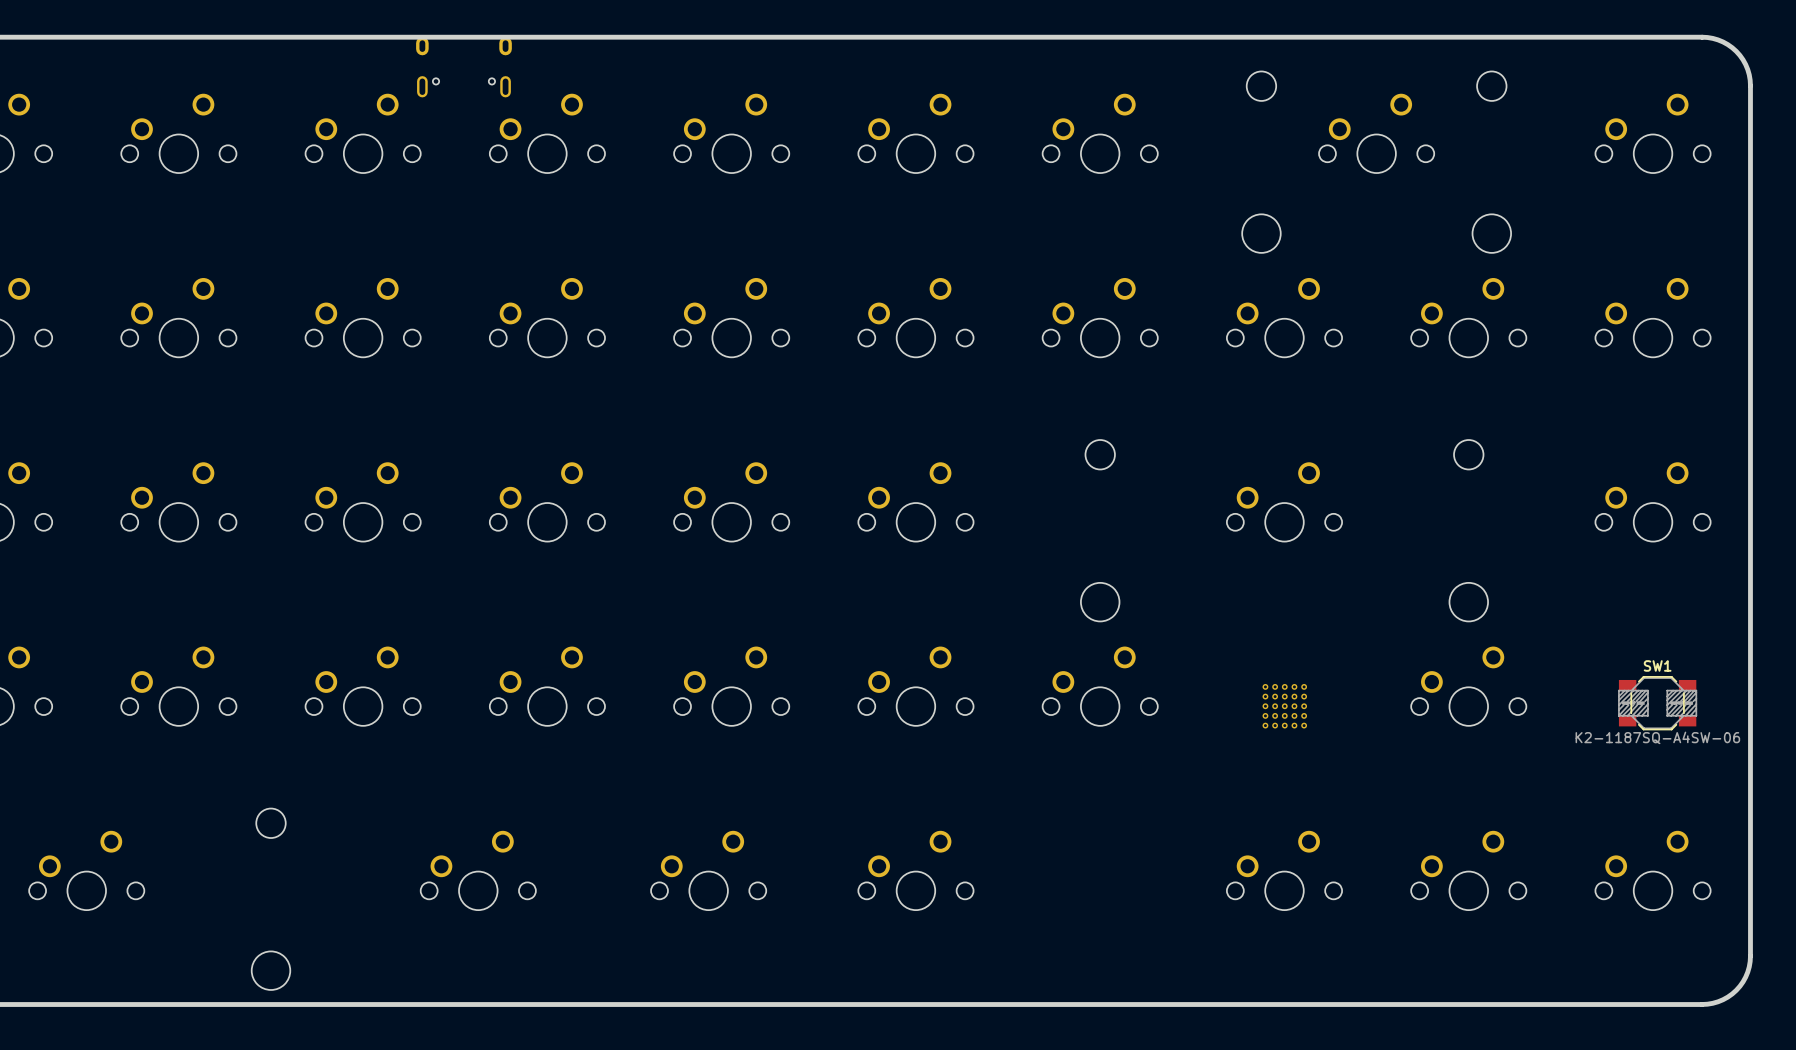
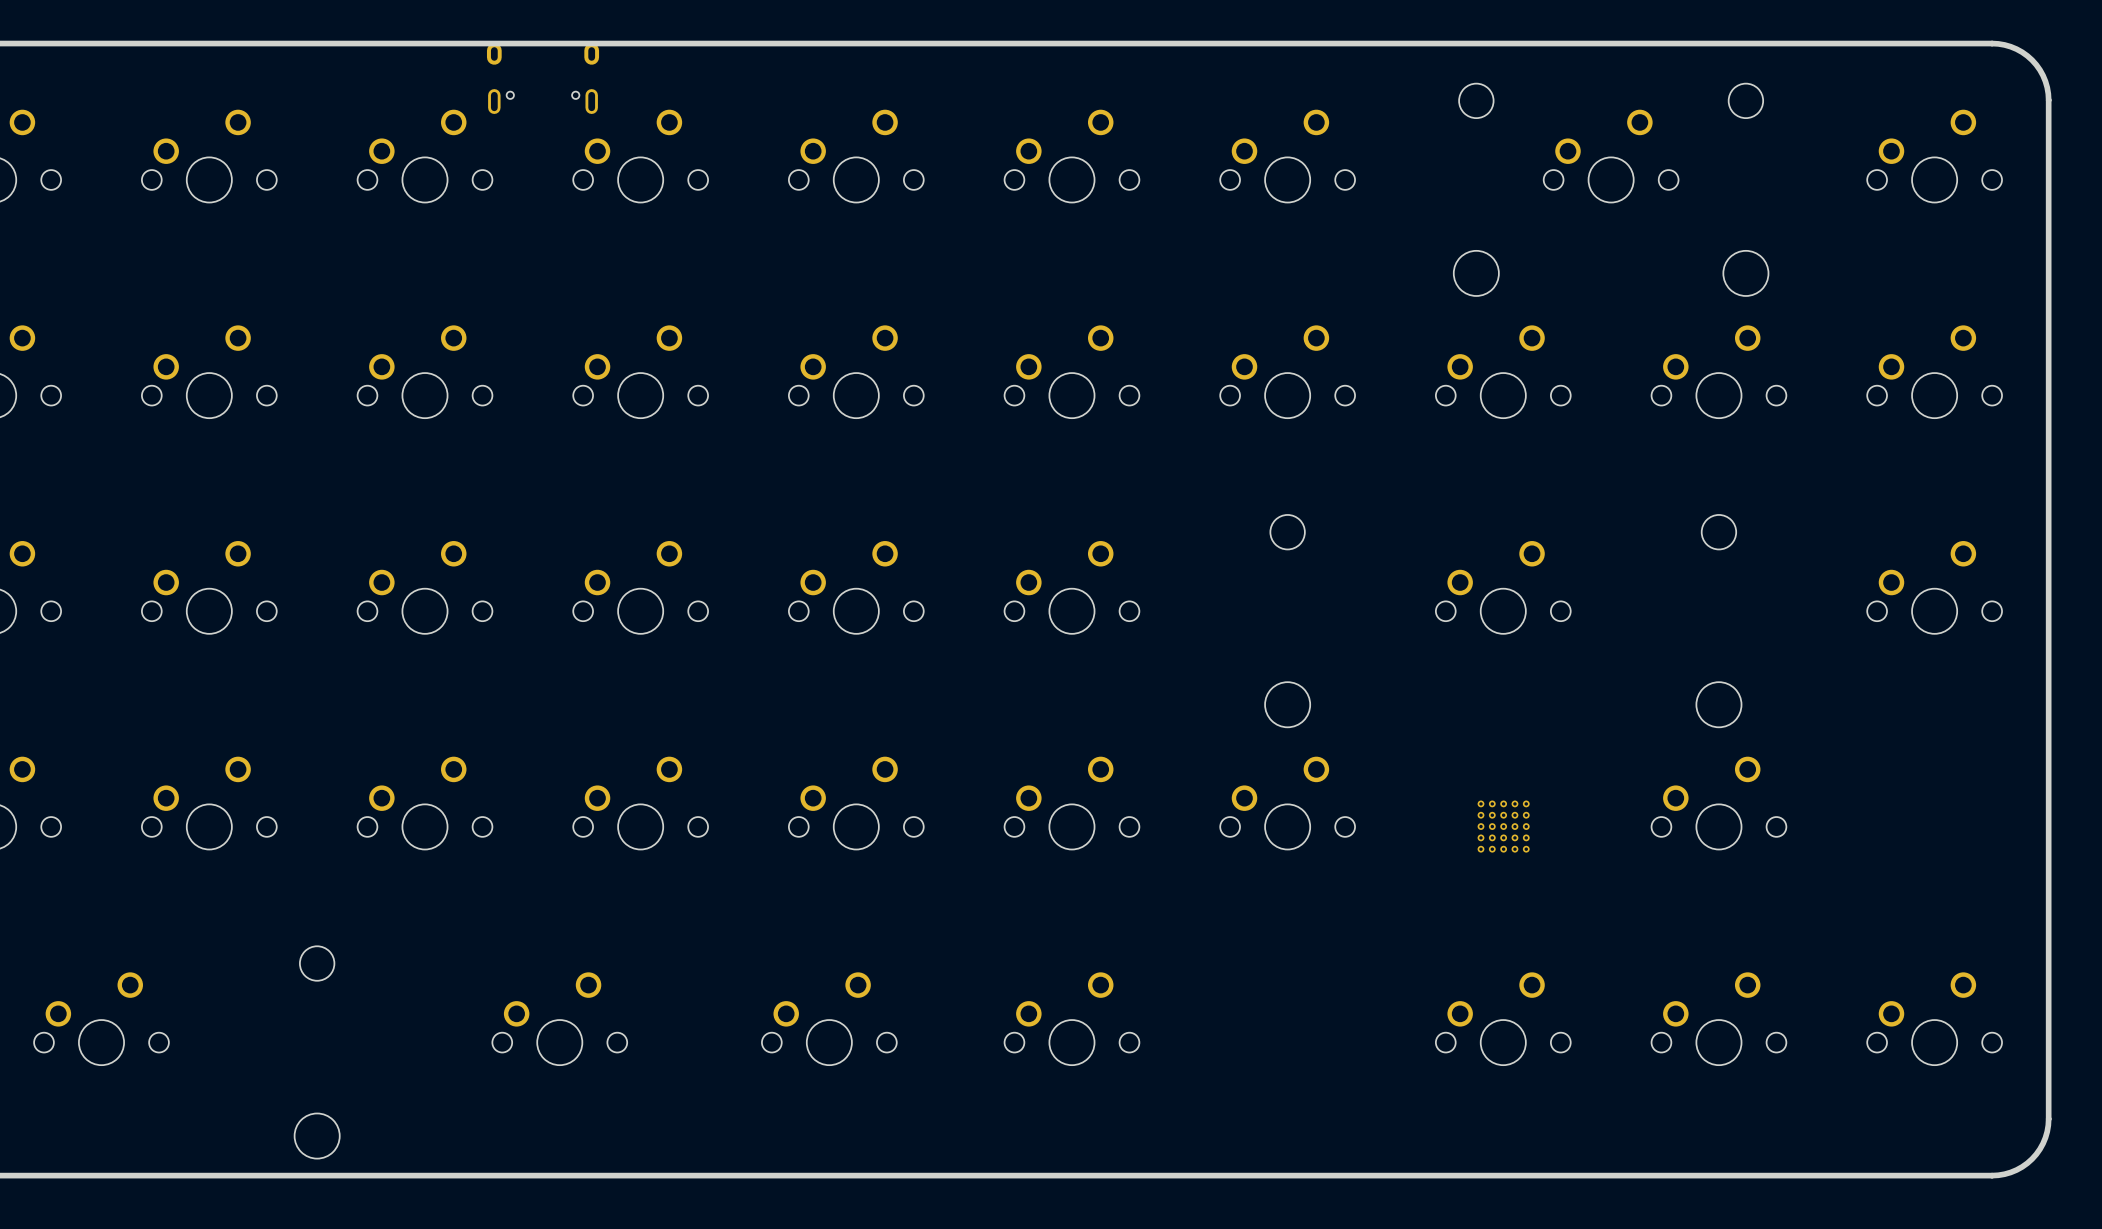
SW1: K2-1187SQ-A4SW-06 (1657, 703) -> none

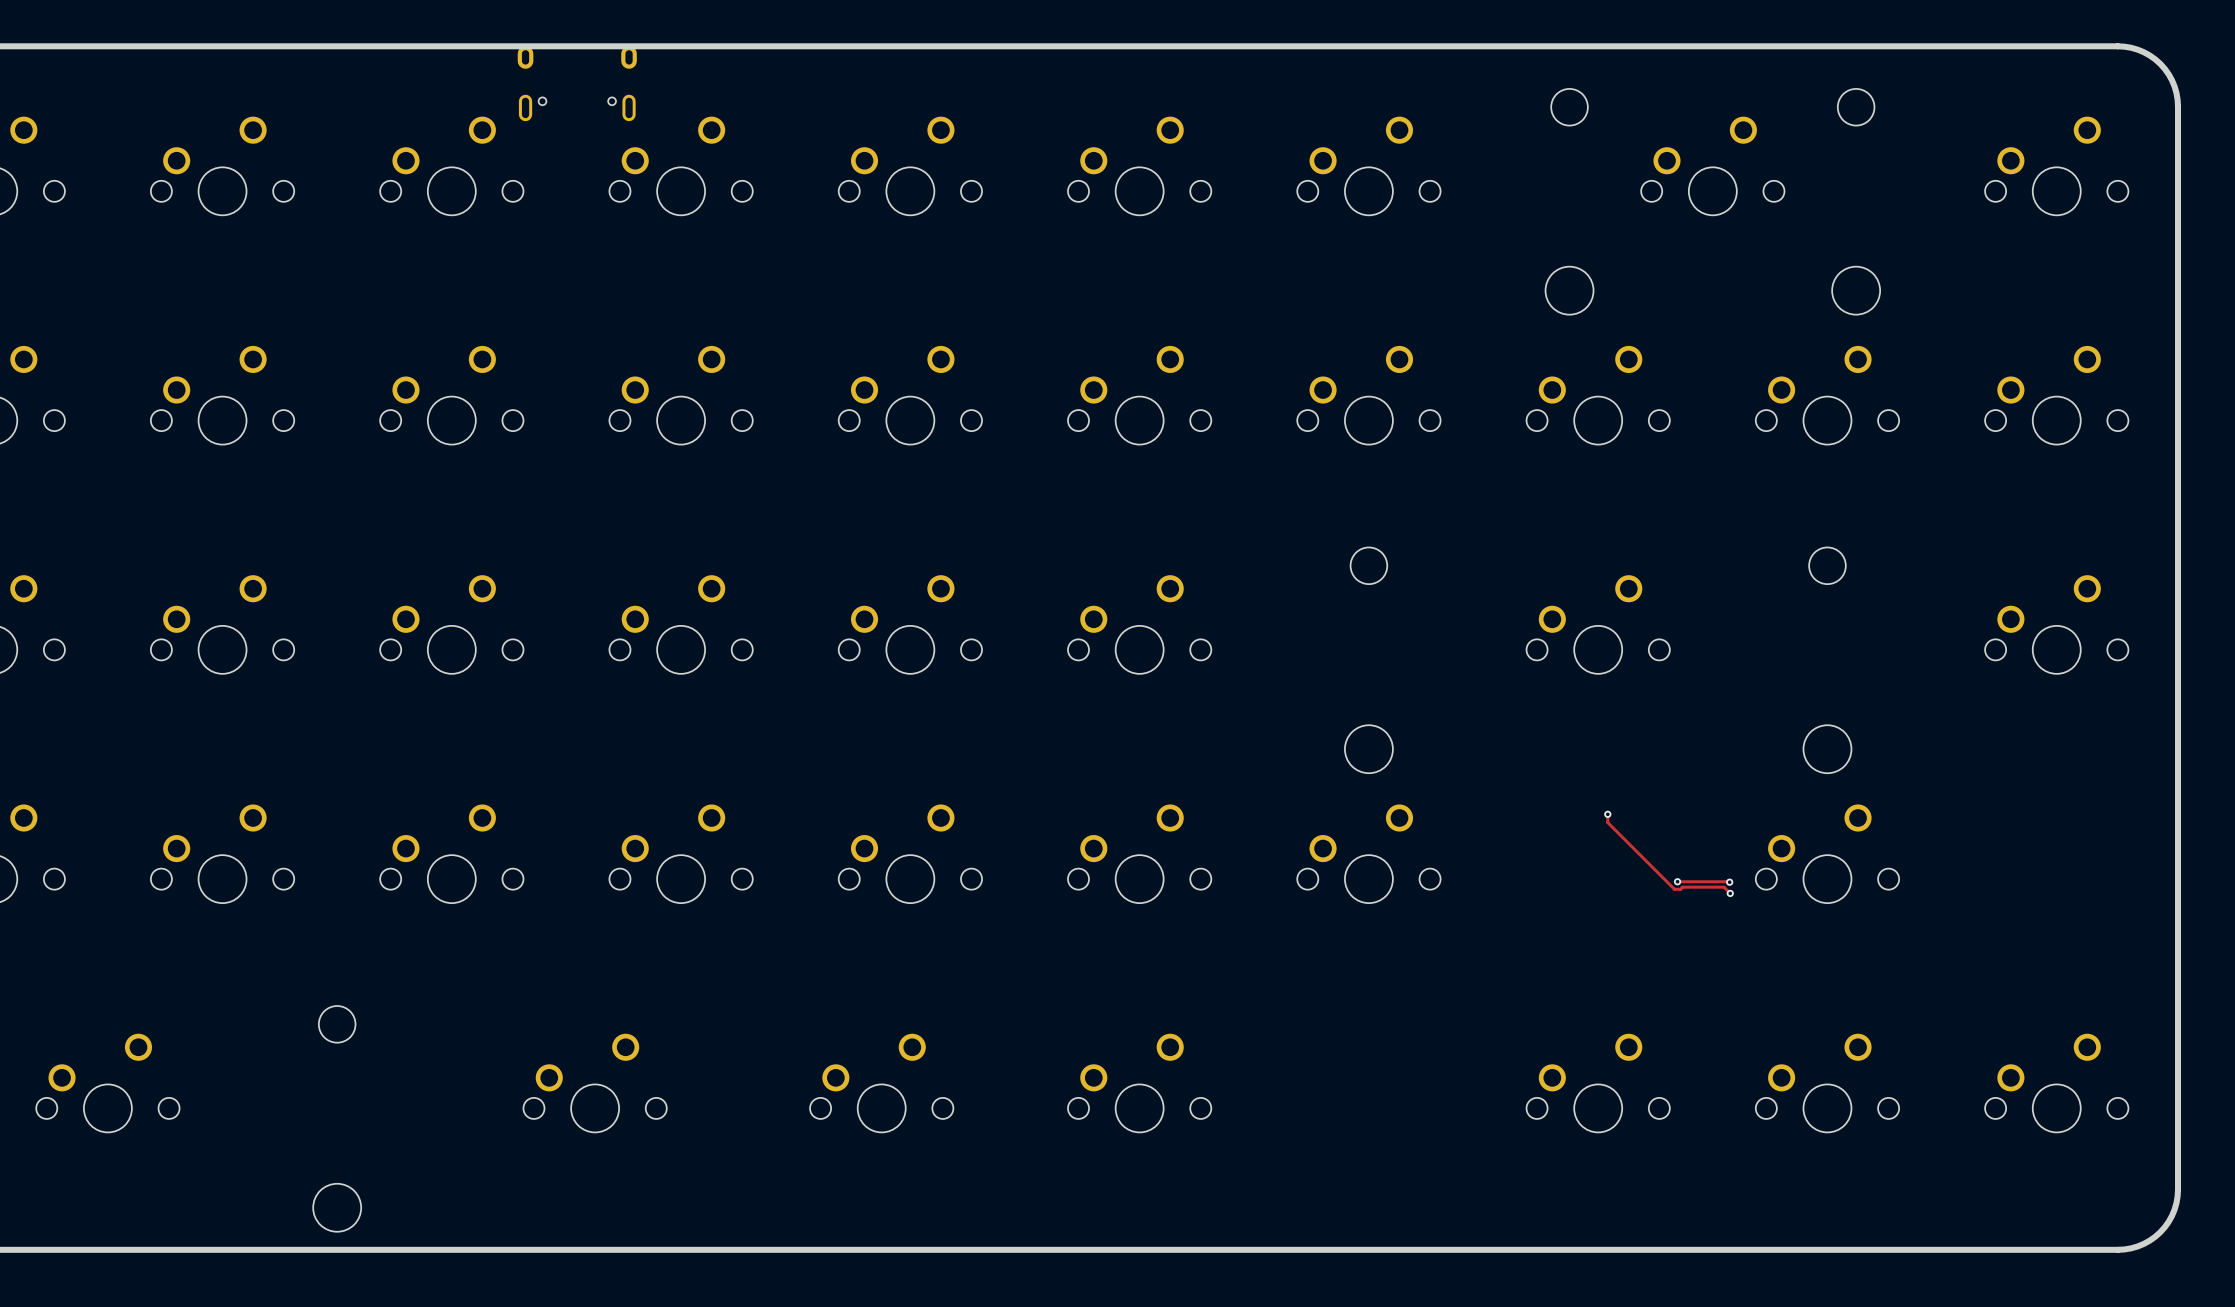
track: none -> (1607, 814) (1607, 822) (1674, 889) (1680, 889) (1682, 887) (1724, 887) (1730, 893)
via: none -> (1607, 814)
part: (1503, 826) -> none
track: none -> (1677, 881) (1729, 882)
via: none -> (1677, 881)
via: none -> (1729, 882)
via: none -> (1730, 893)

